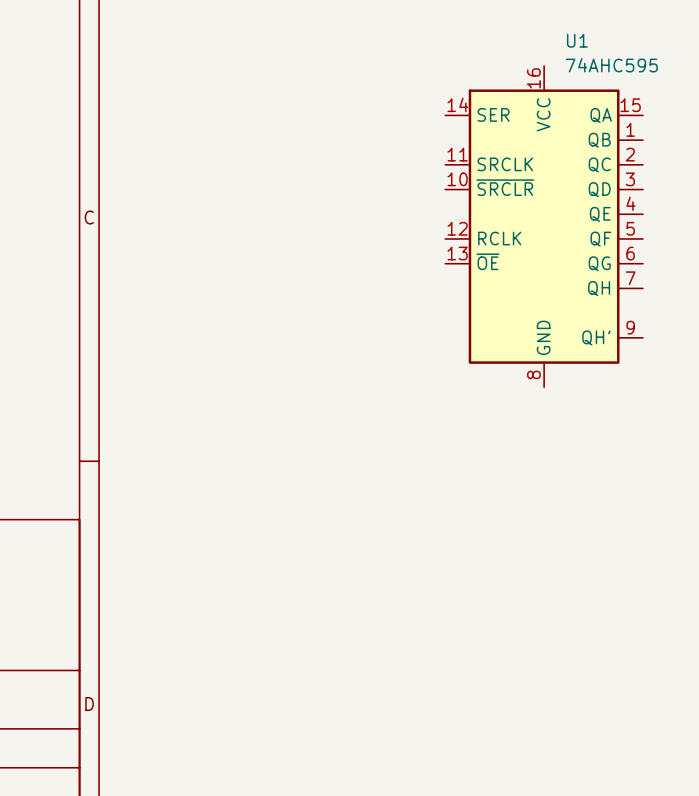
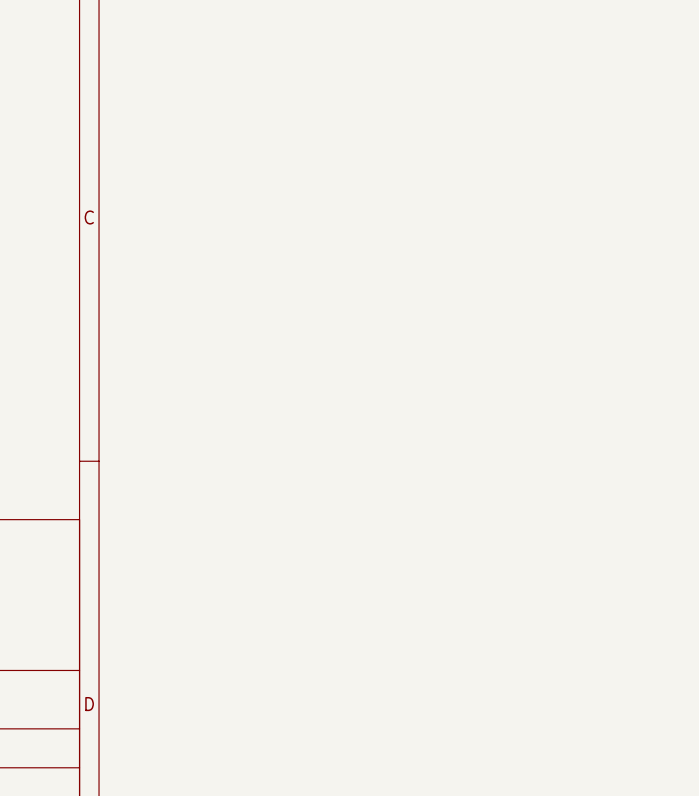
U1: 74AHC595 (544, 226) -> none

